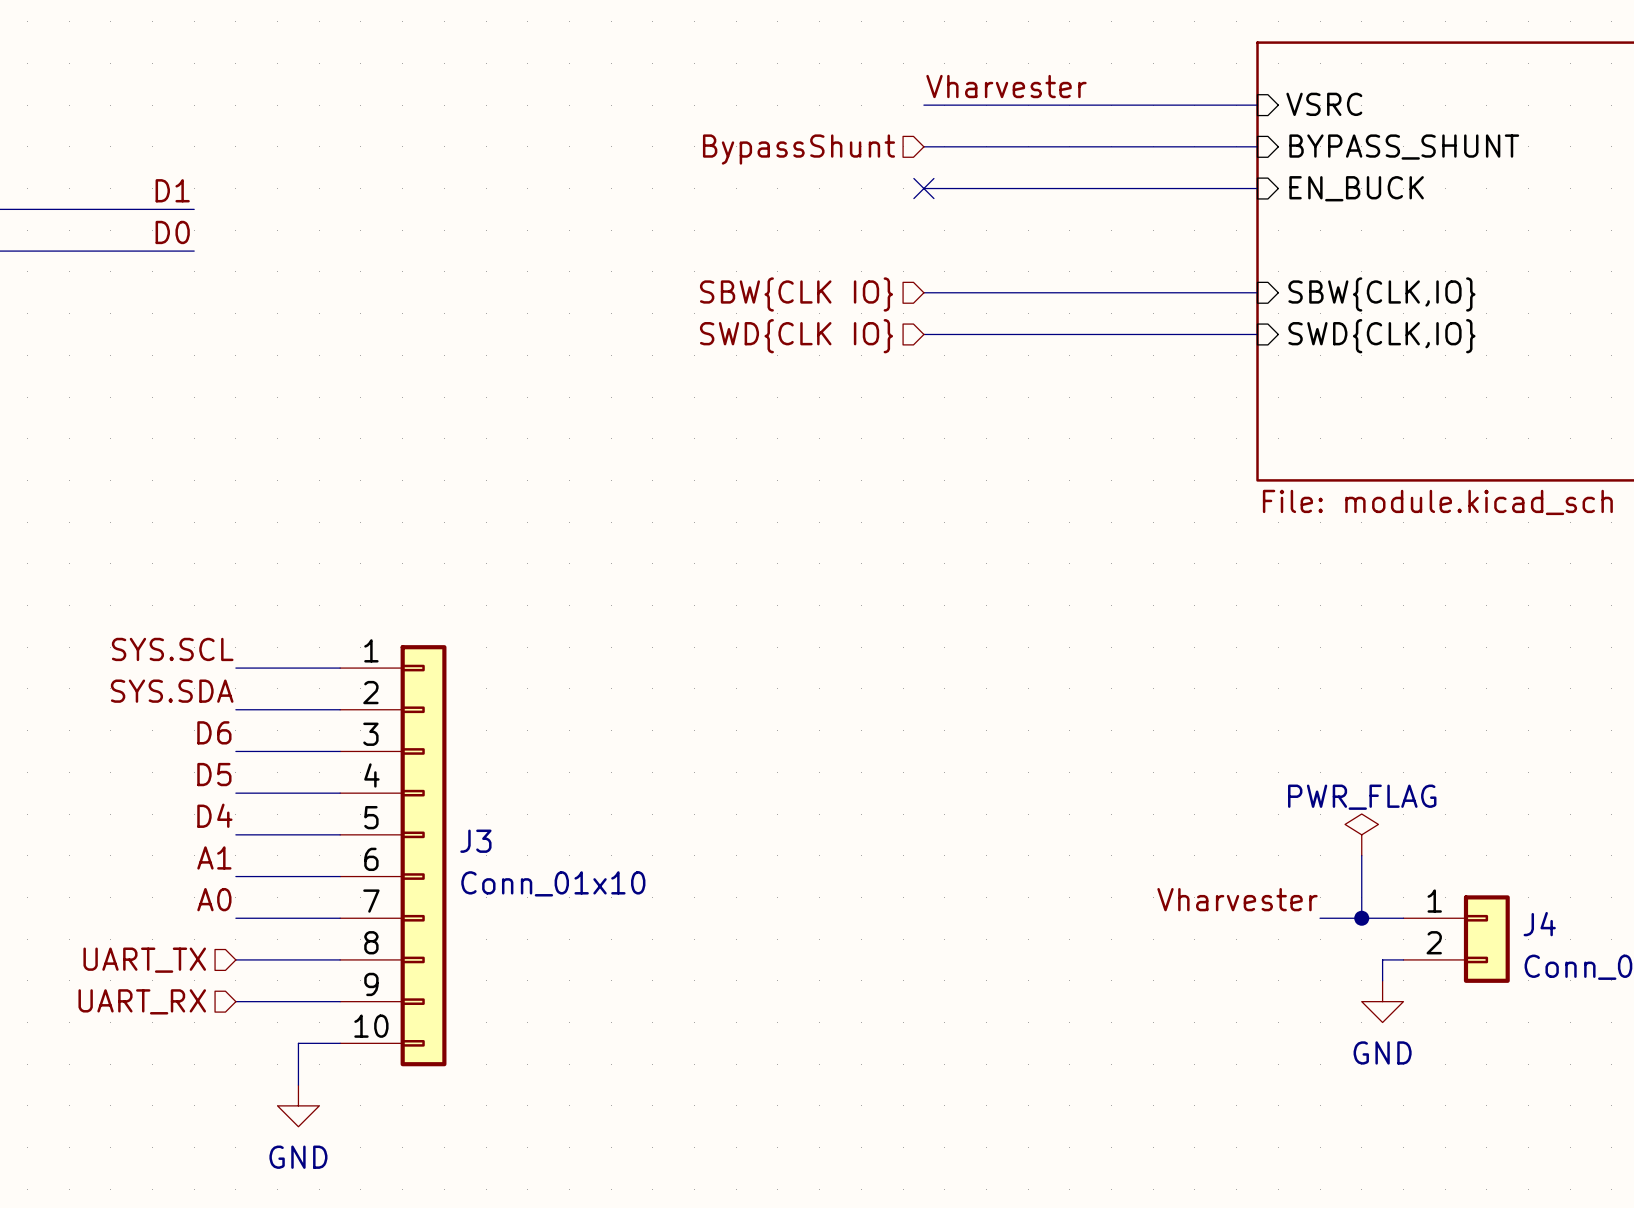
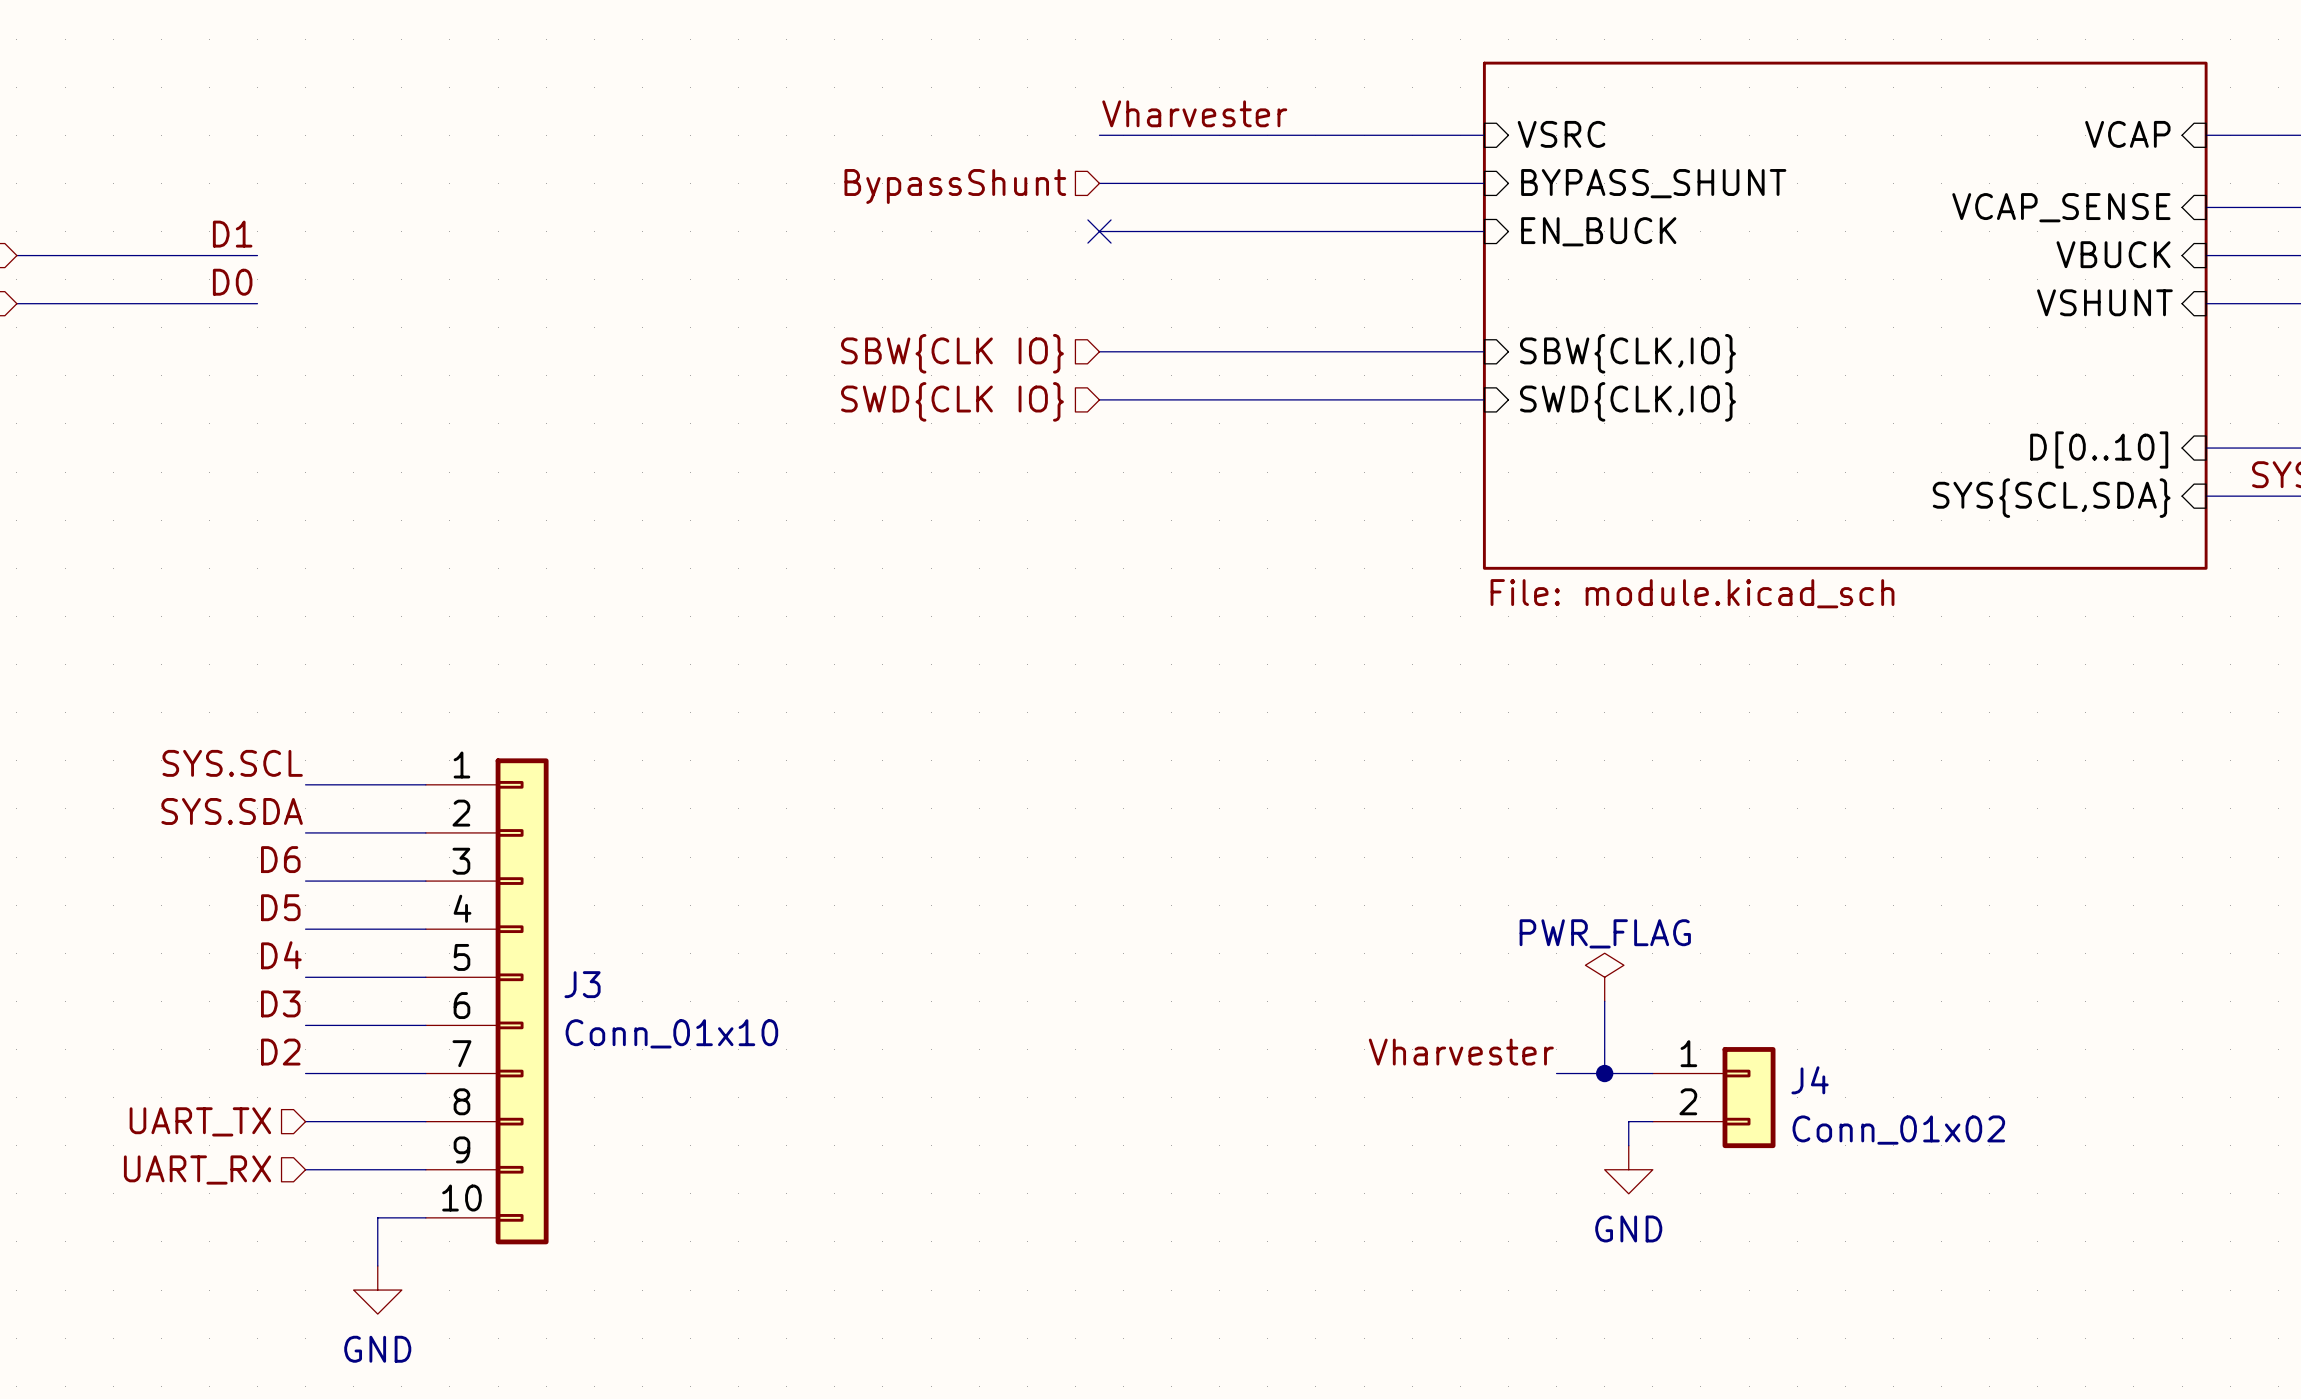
label: A1 (214, 857) -> D3 (280, 1003)
label: A0 (214, 899) -> D2 (280, 1052)

